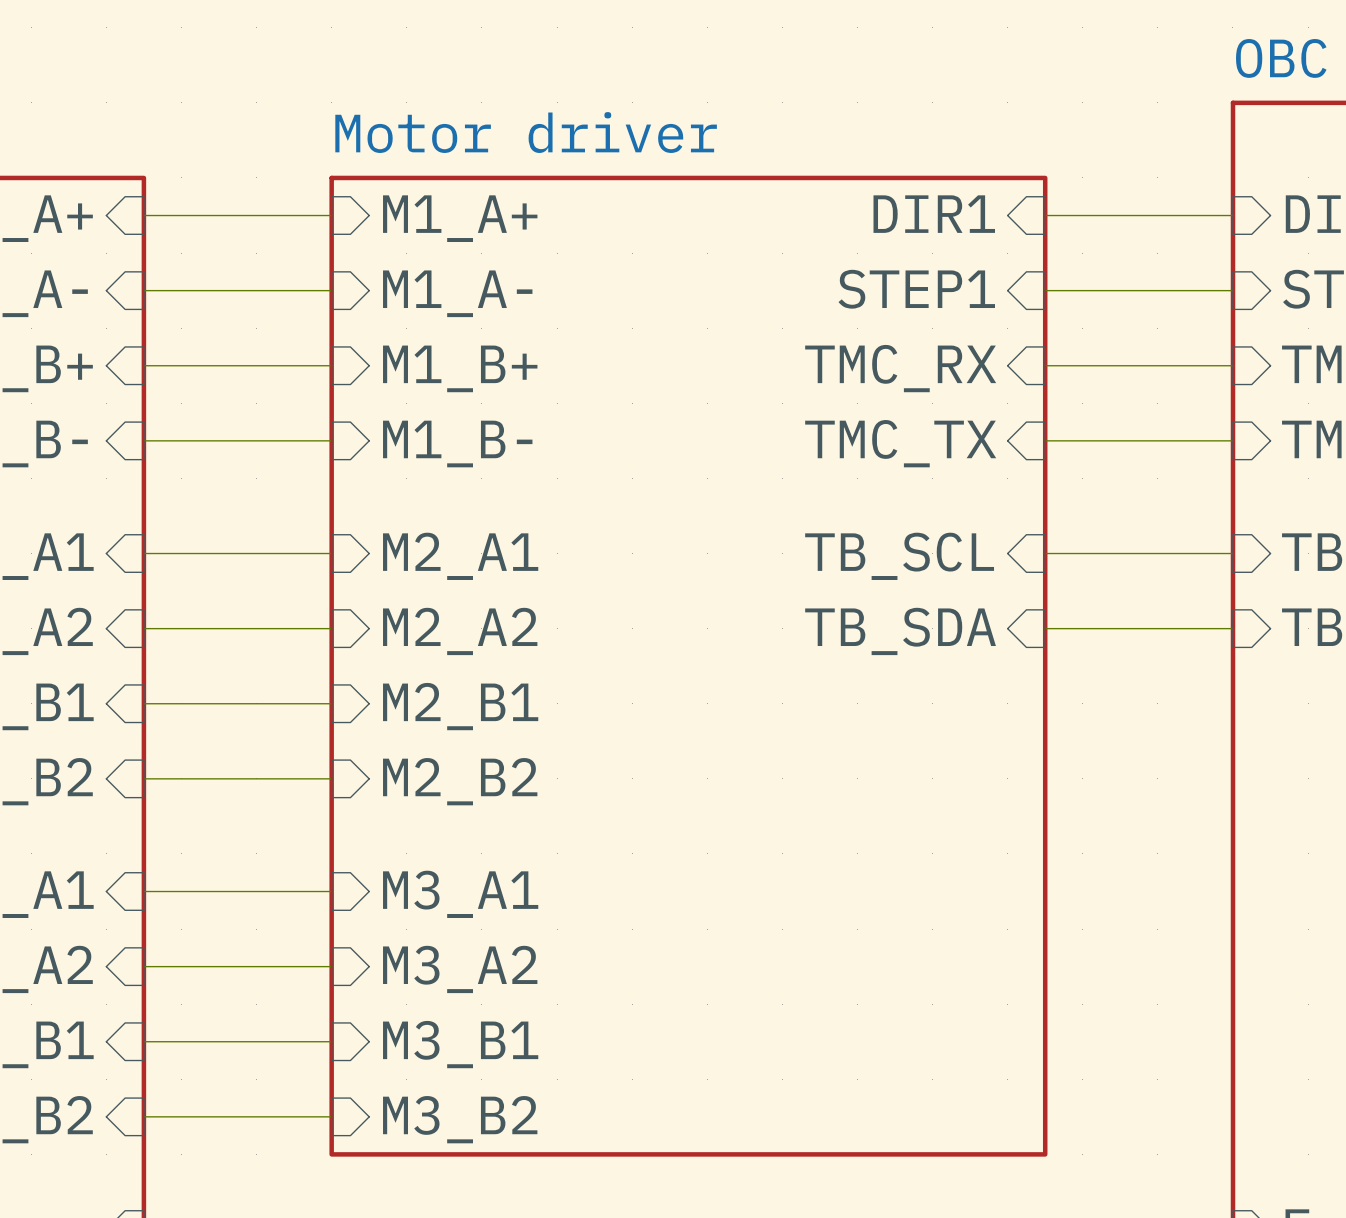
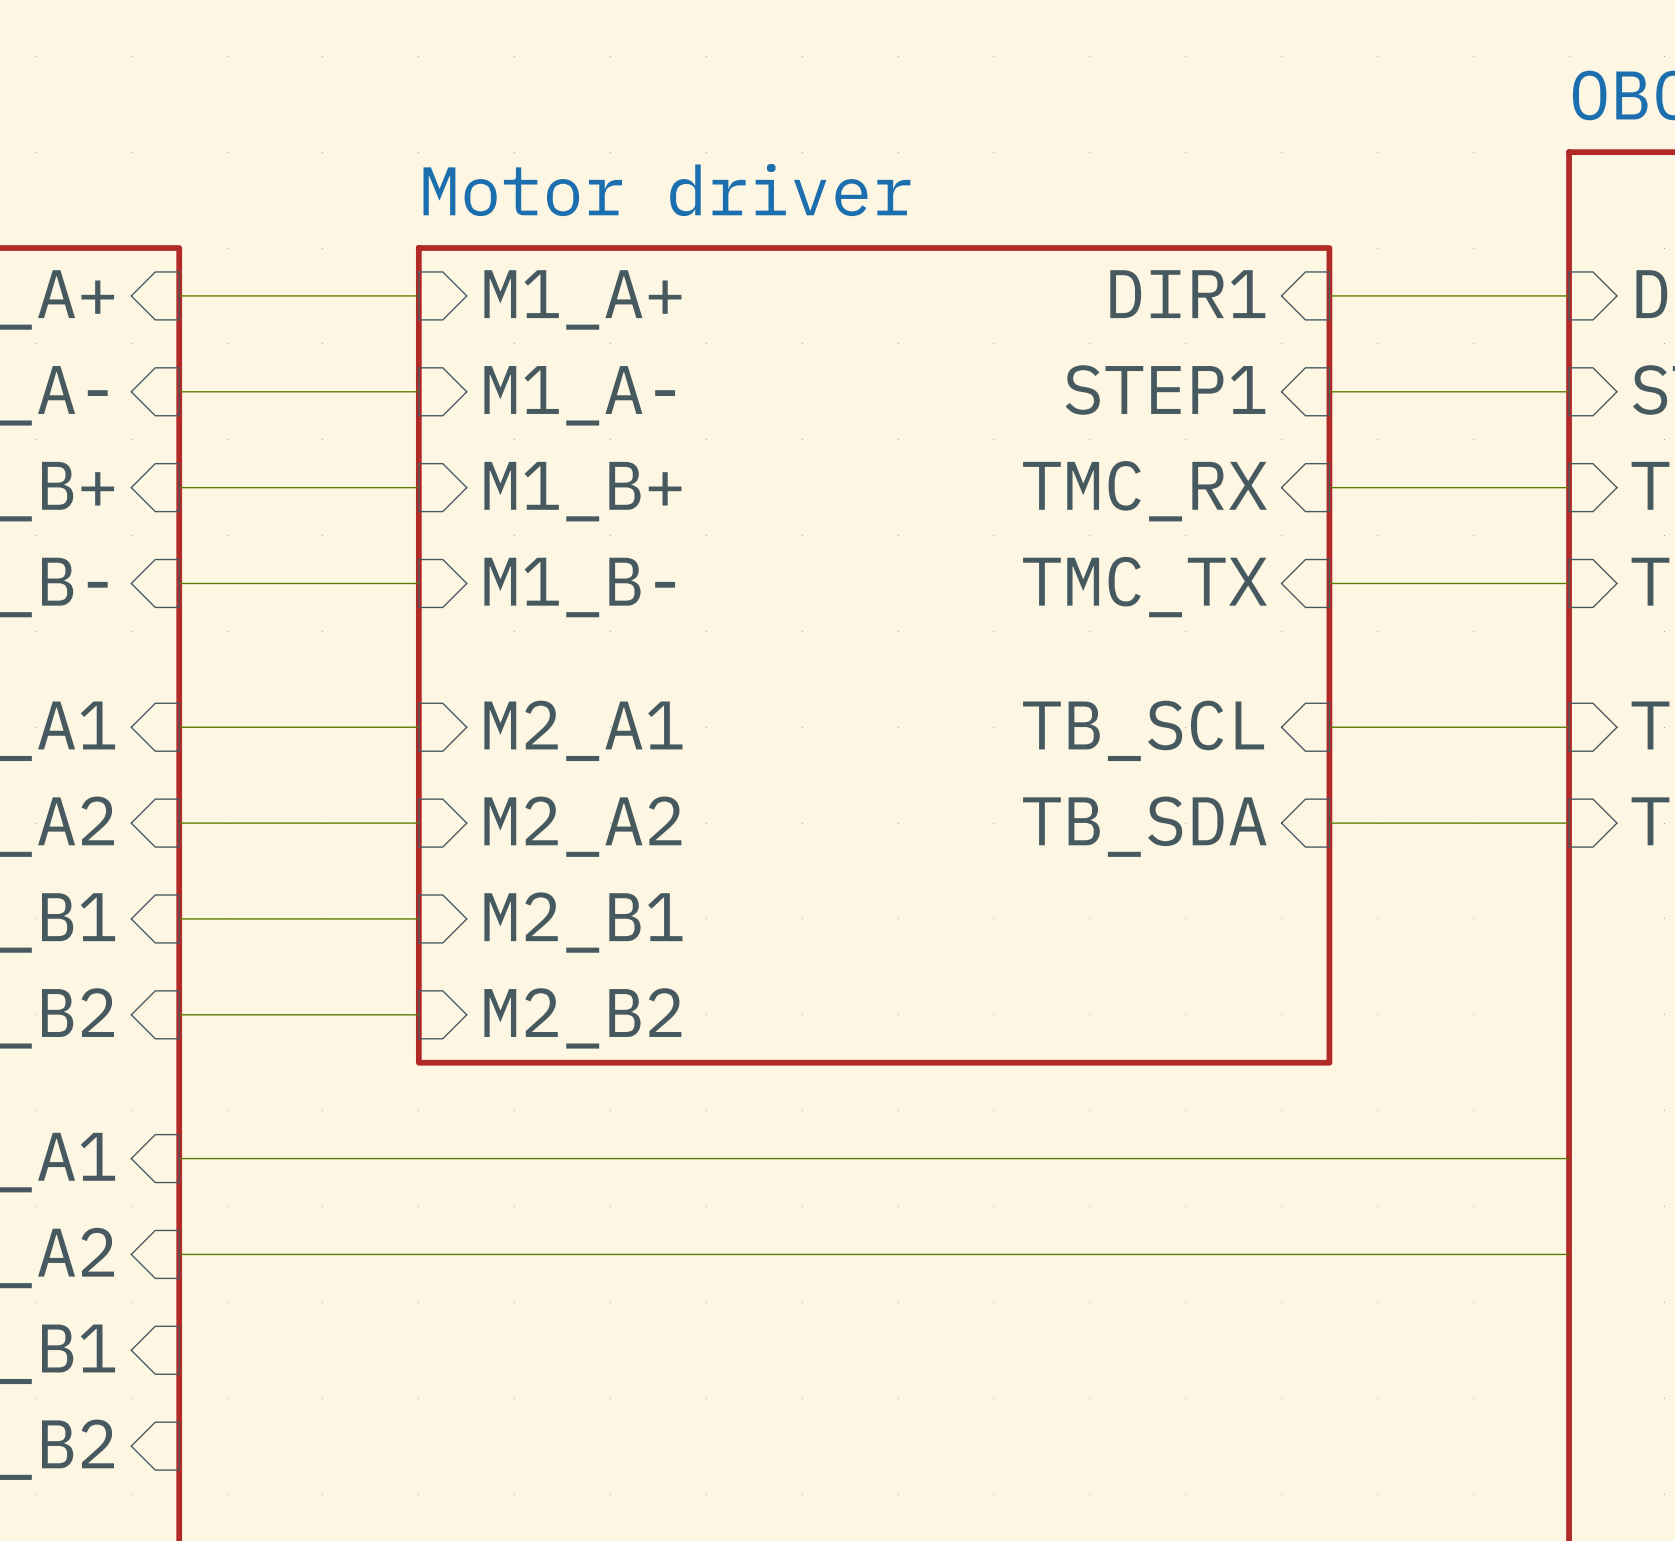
sheet Motor driver: none -> (874, 655)
sheet Motor driver: (688, 666) -> none
wire: none -> (418, 1158) (1569, 1158)
sheet pin: M3_A1 (460, 894) -> none
wire: none -> (418, 1254) (1569, 1254)
sheet pin: M3_A2 (460, 969) -> none
wire: (143, 1041) (331, 1041) -> none
sheet pin: M3_B1 (460, 1044) -> none
wire: (143, 1116) (331, 1116) -> none
sheet pin: M3_B2 (460, 1119) -> none

